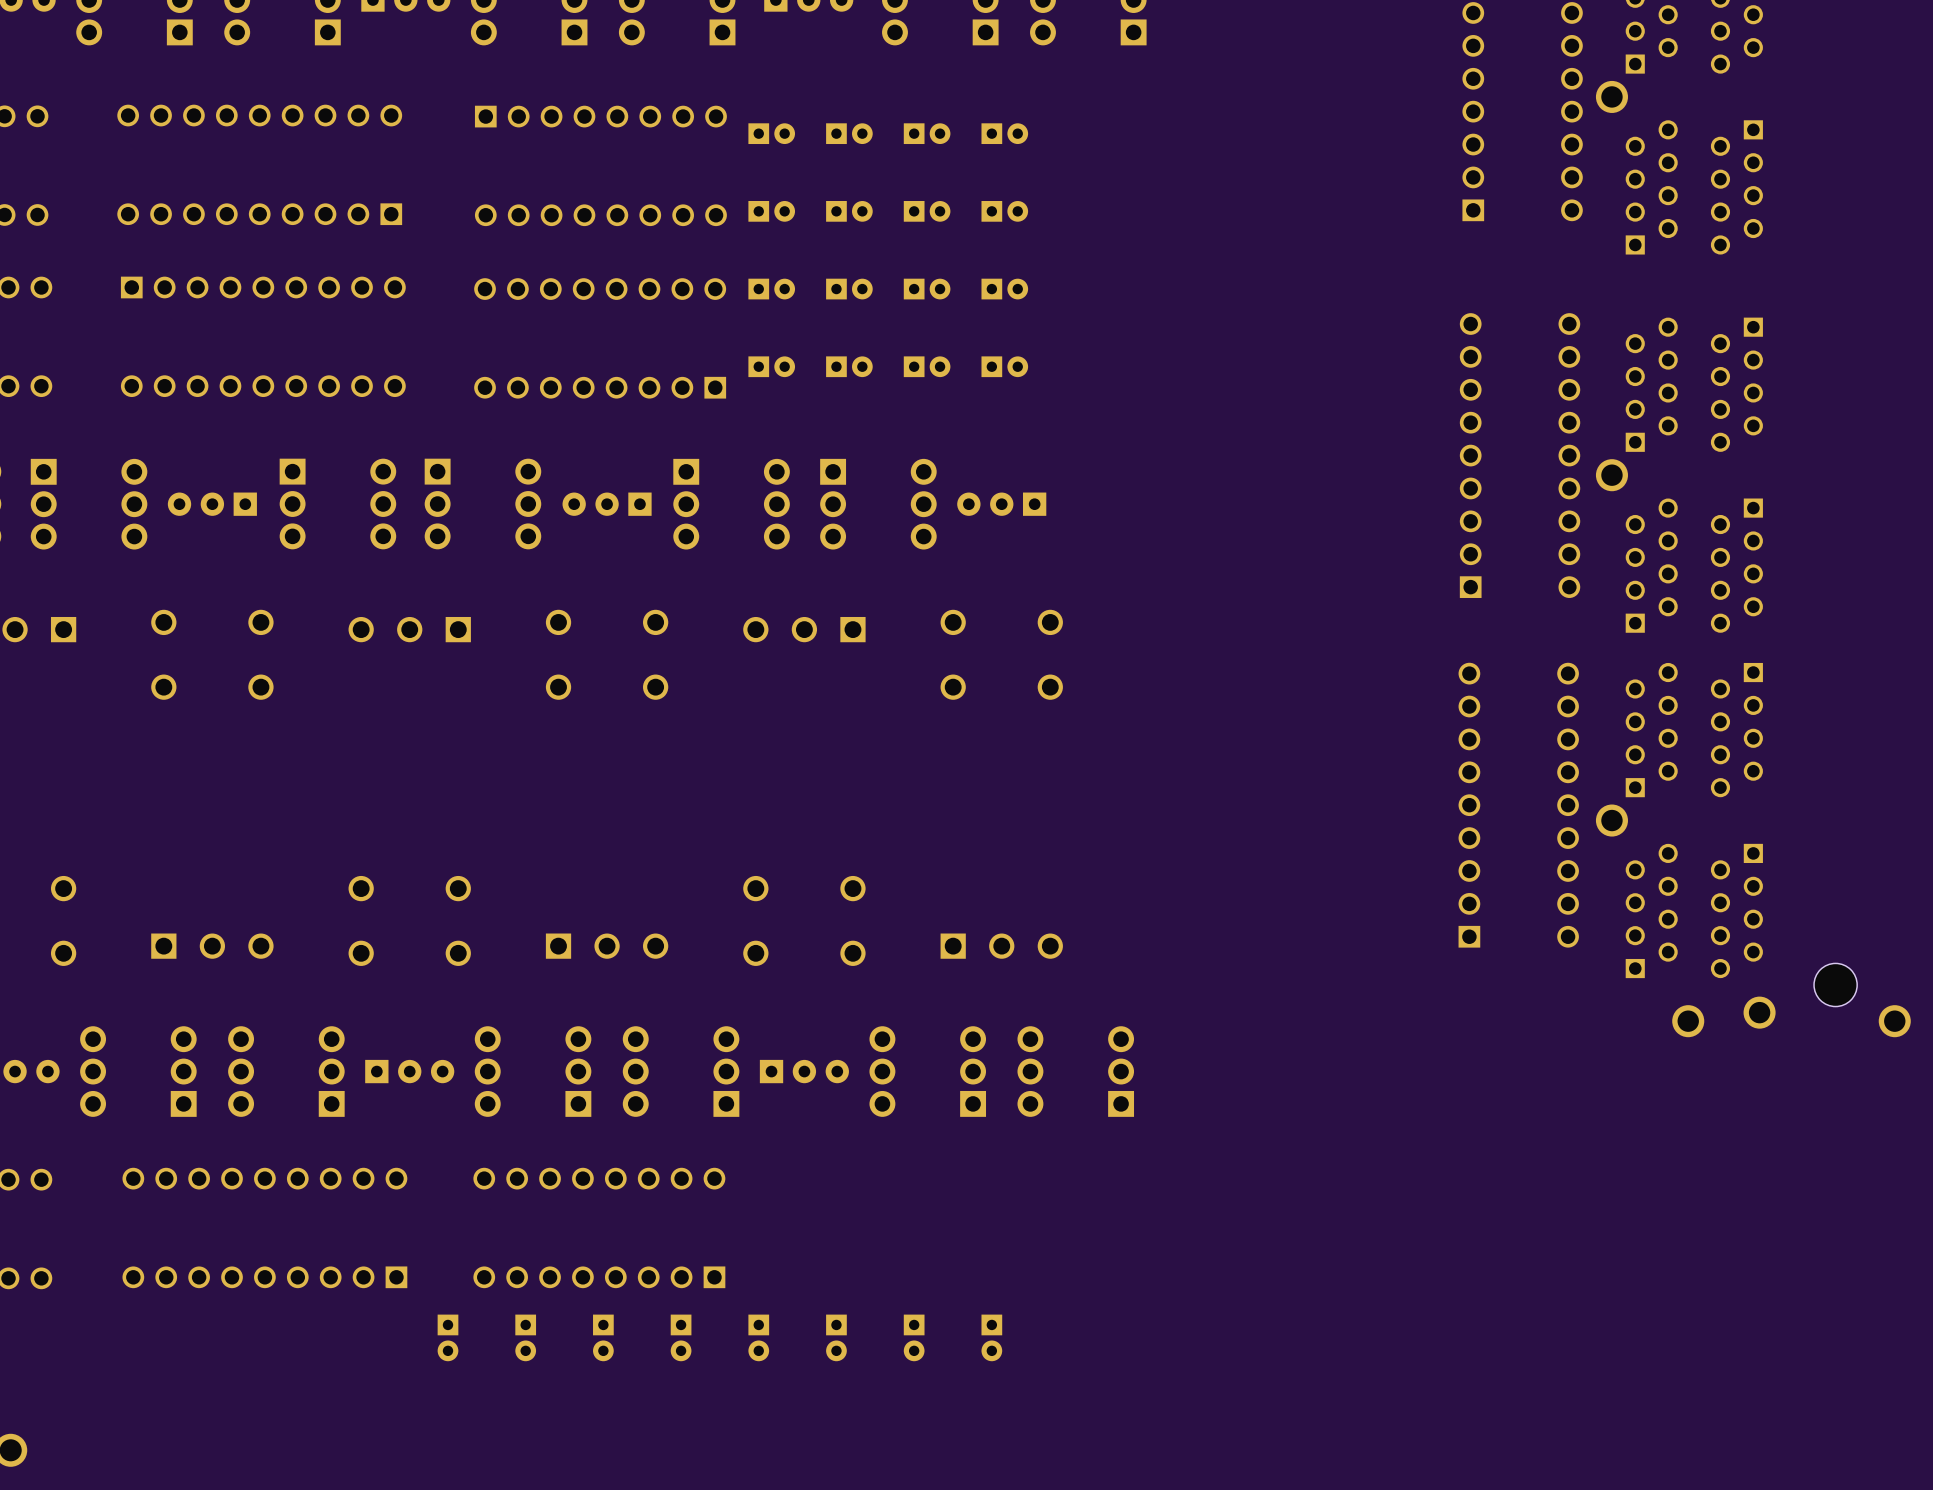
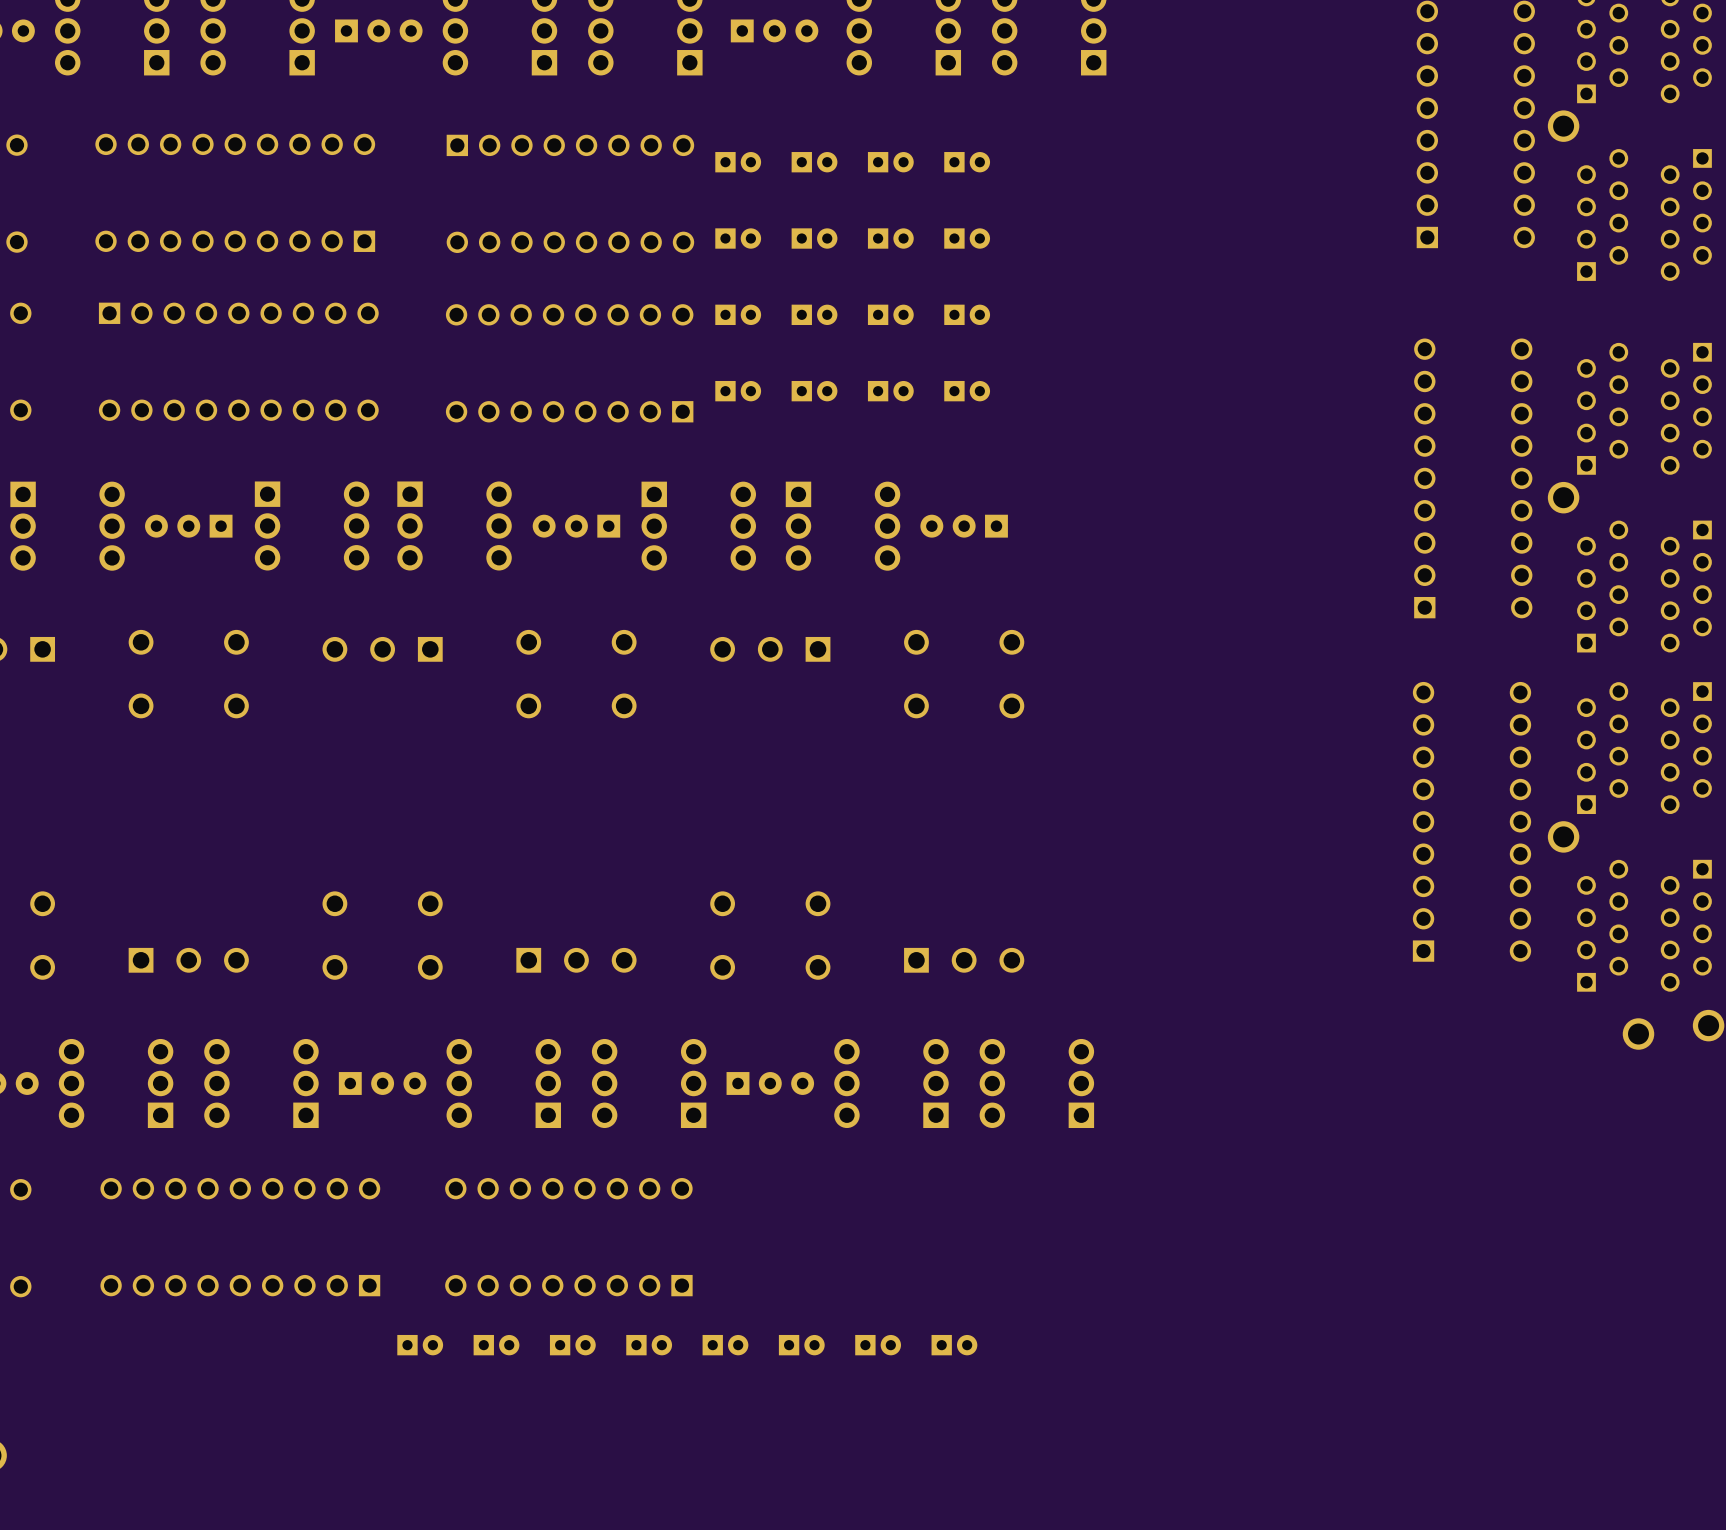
part rotation: 0° (447, 1337) -> 90° counterclockwise (420, 1345)
part rotation: 0° (525, 1337) -> 90° counterclockwise (496, 1345)
part rotation: 0° (603, 1337) -> 90° counterclockwise (572, 1345)
part rotation: 0° (681, 1337) -> 90° counterclockwise (649, 1345)
part rotation: 0° (758, 1337) -> 90° counterclockwise (725, 1345)
part rotation: 0° (836, 1337) -> 90° counterclockwise (801, 1345)
part rotation: 0° (914, 1337) -> 90° counterclockwise (878, 1345)
part rotation: 0° (991, 1337) -> 90° counterclockwise (954, 1345)

